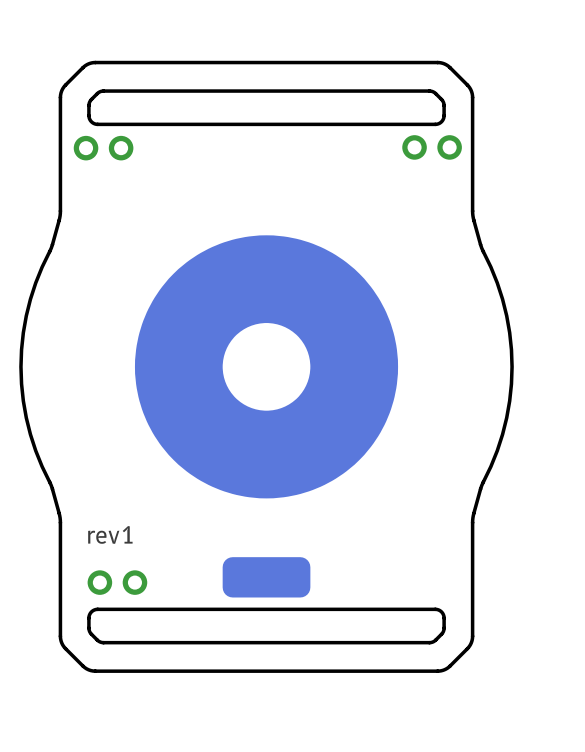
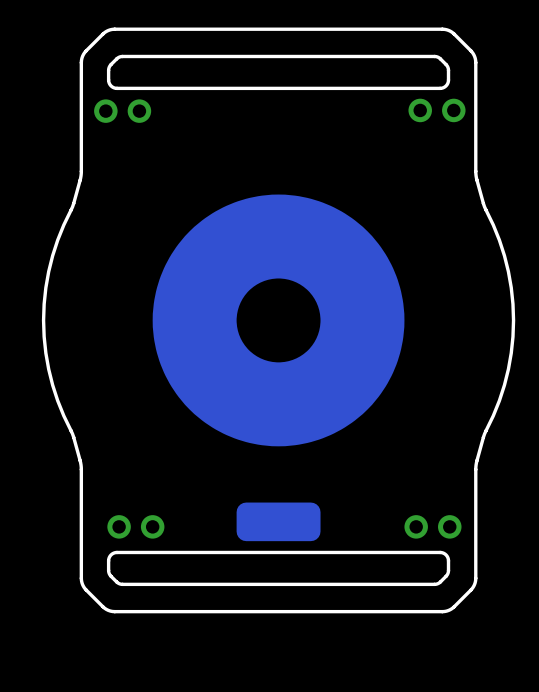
text: rev1 (110, 534) -> none
part: none -> (432, 526)

